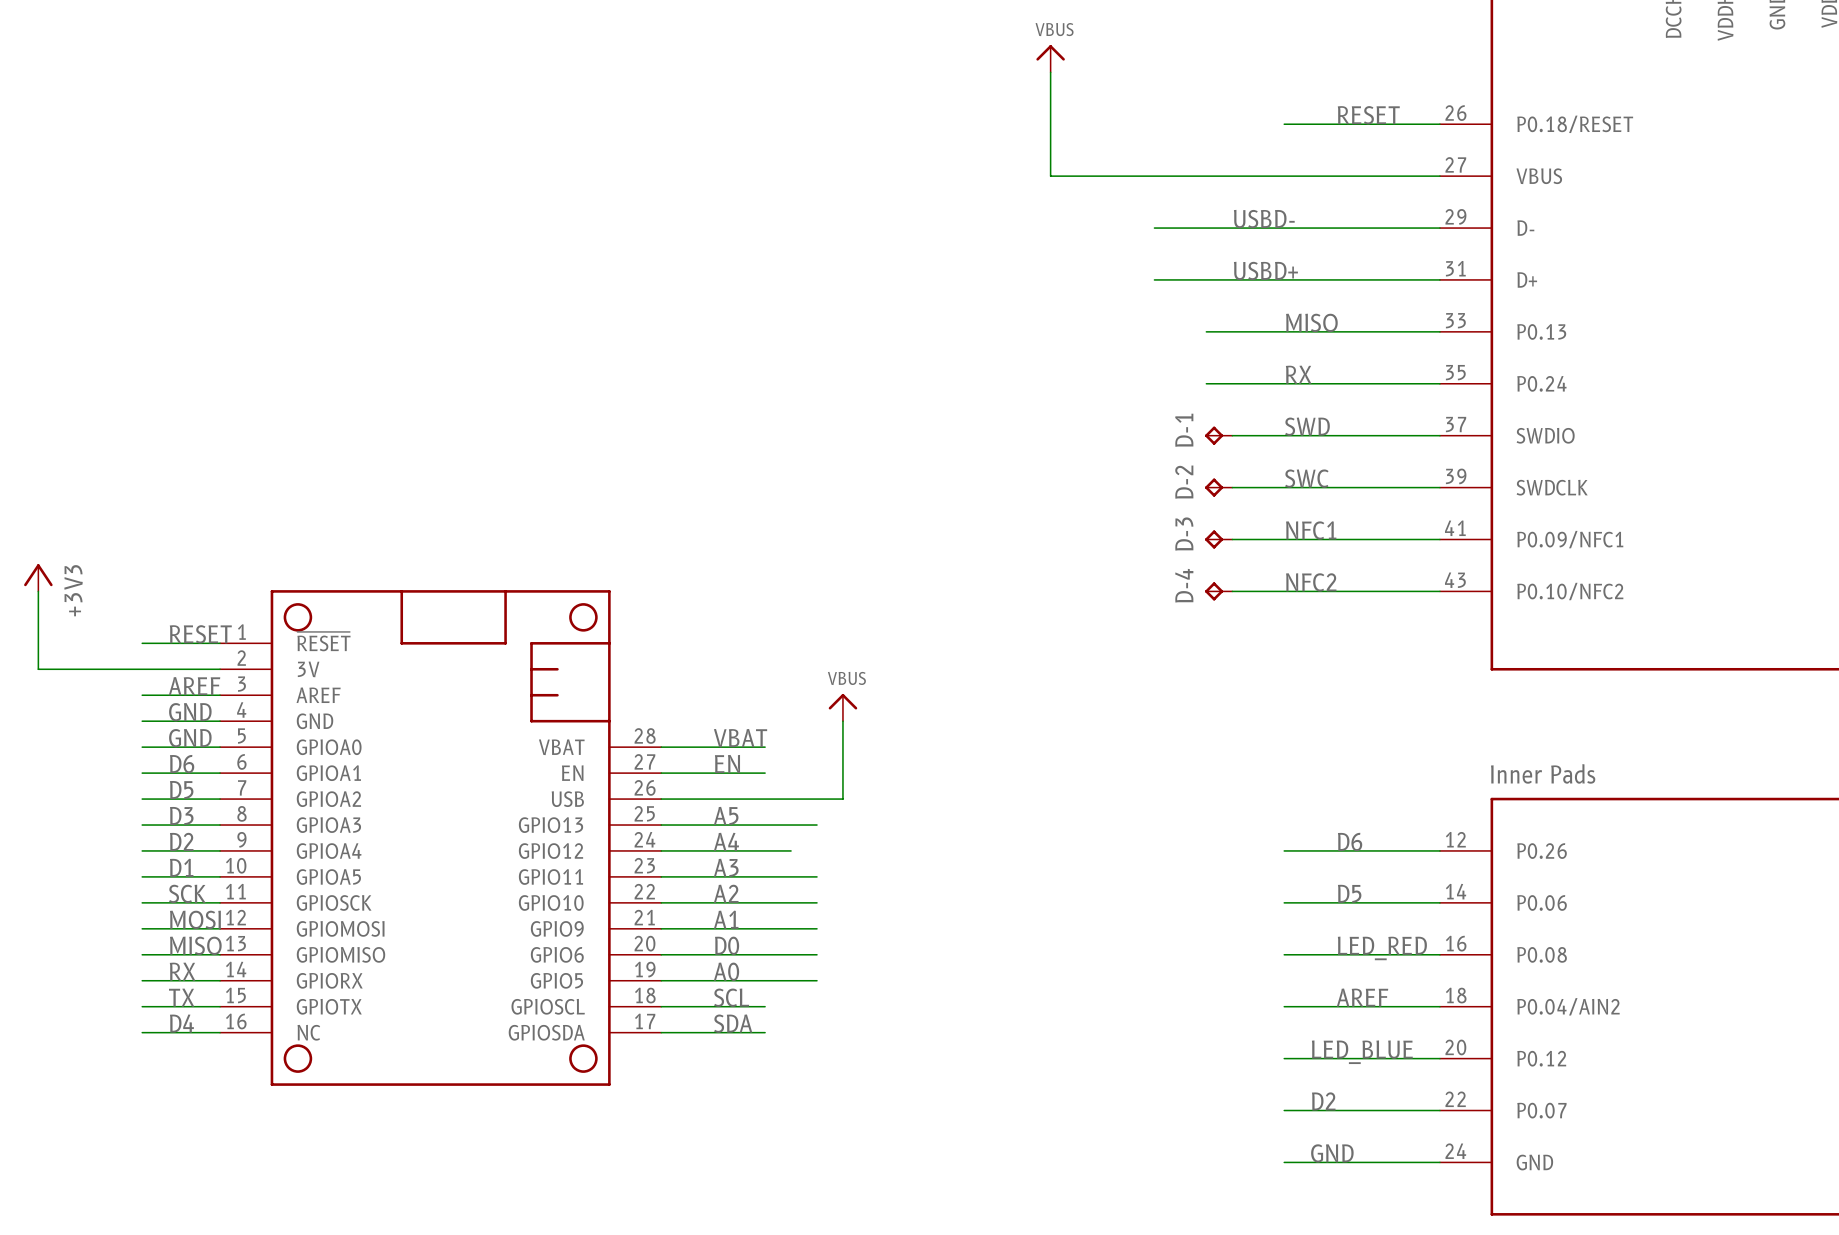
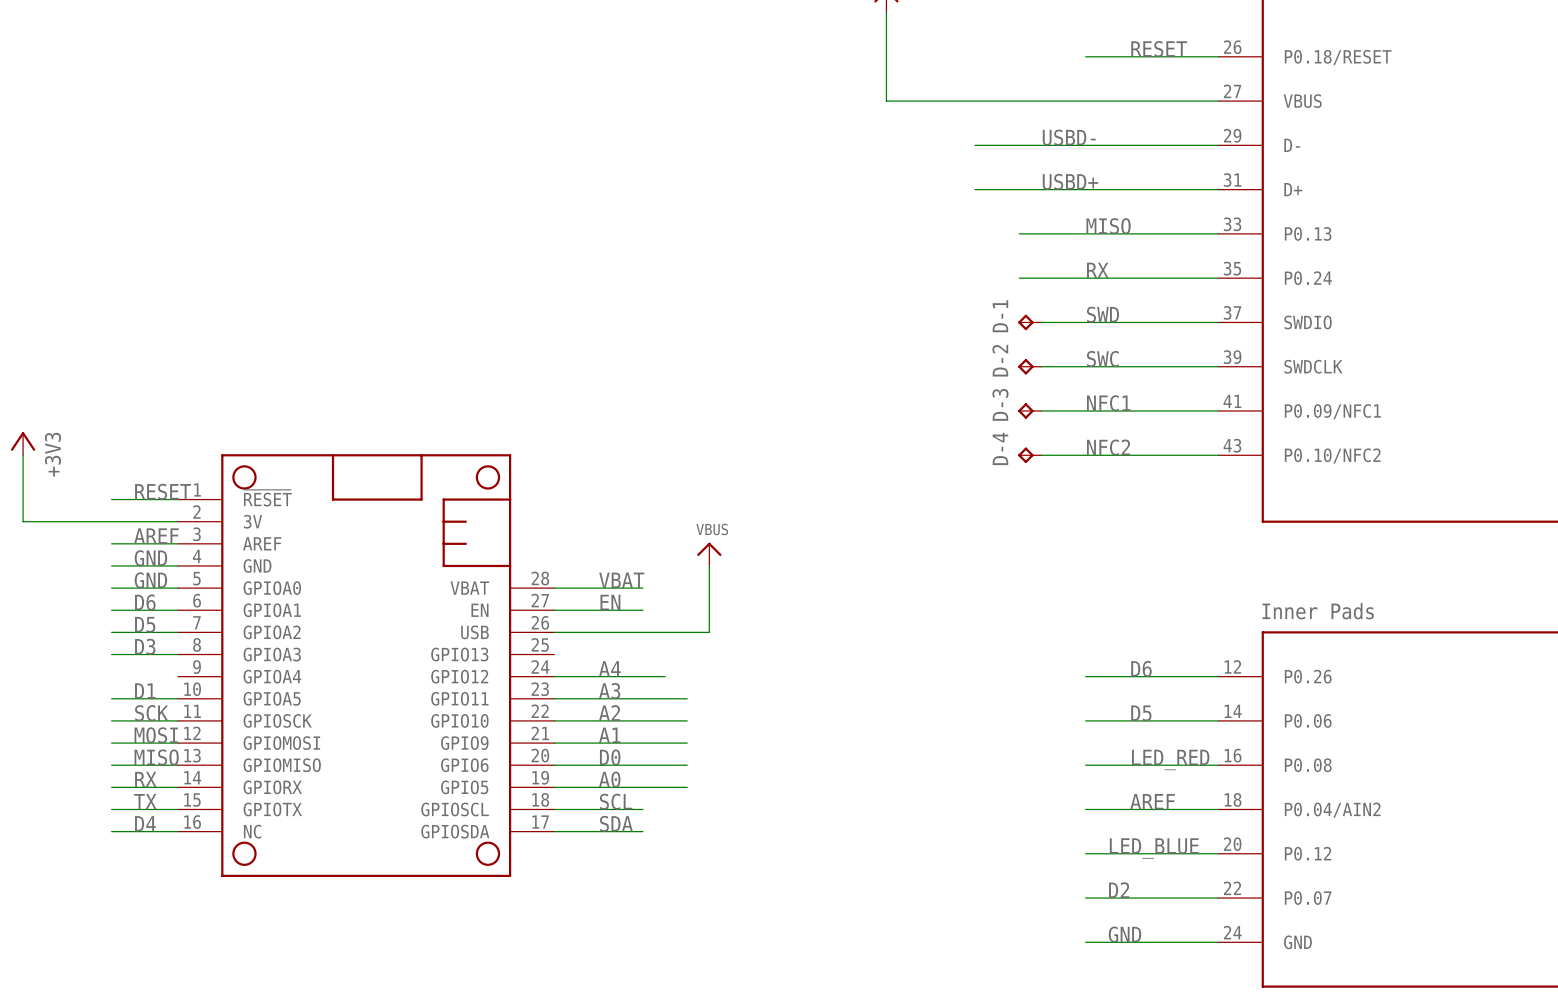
label: A5 (726, 815) -> none
wire: (661, 825) (817, 825) -> none
label: D2 (181, 841) -> none
wire: (142, 850) (220, 850) -> none

